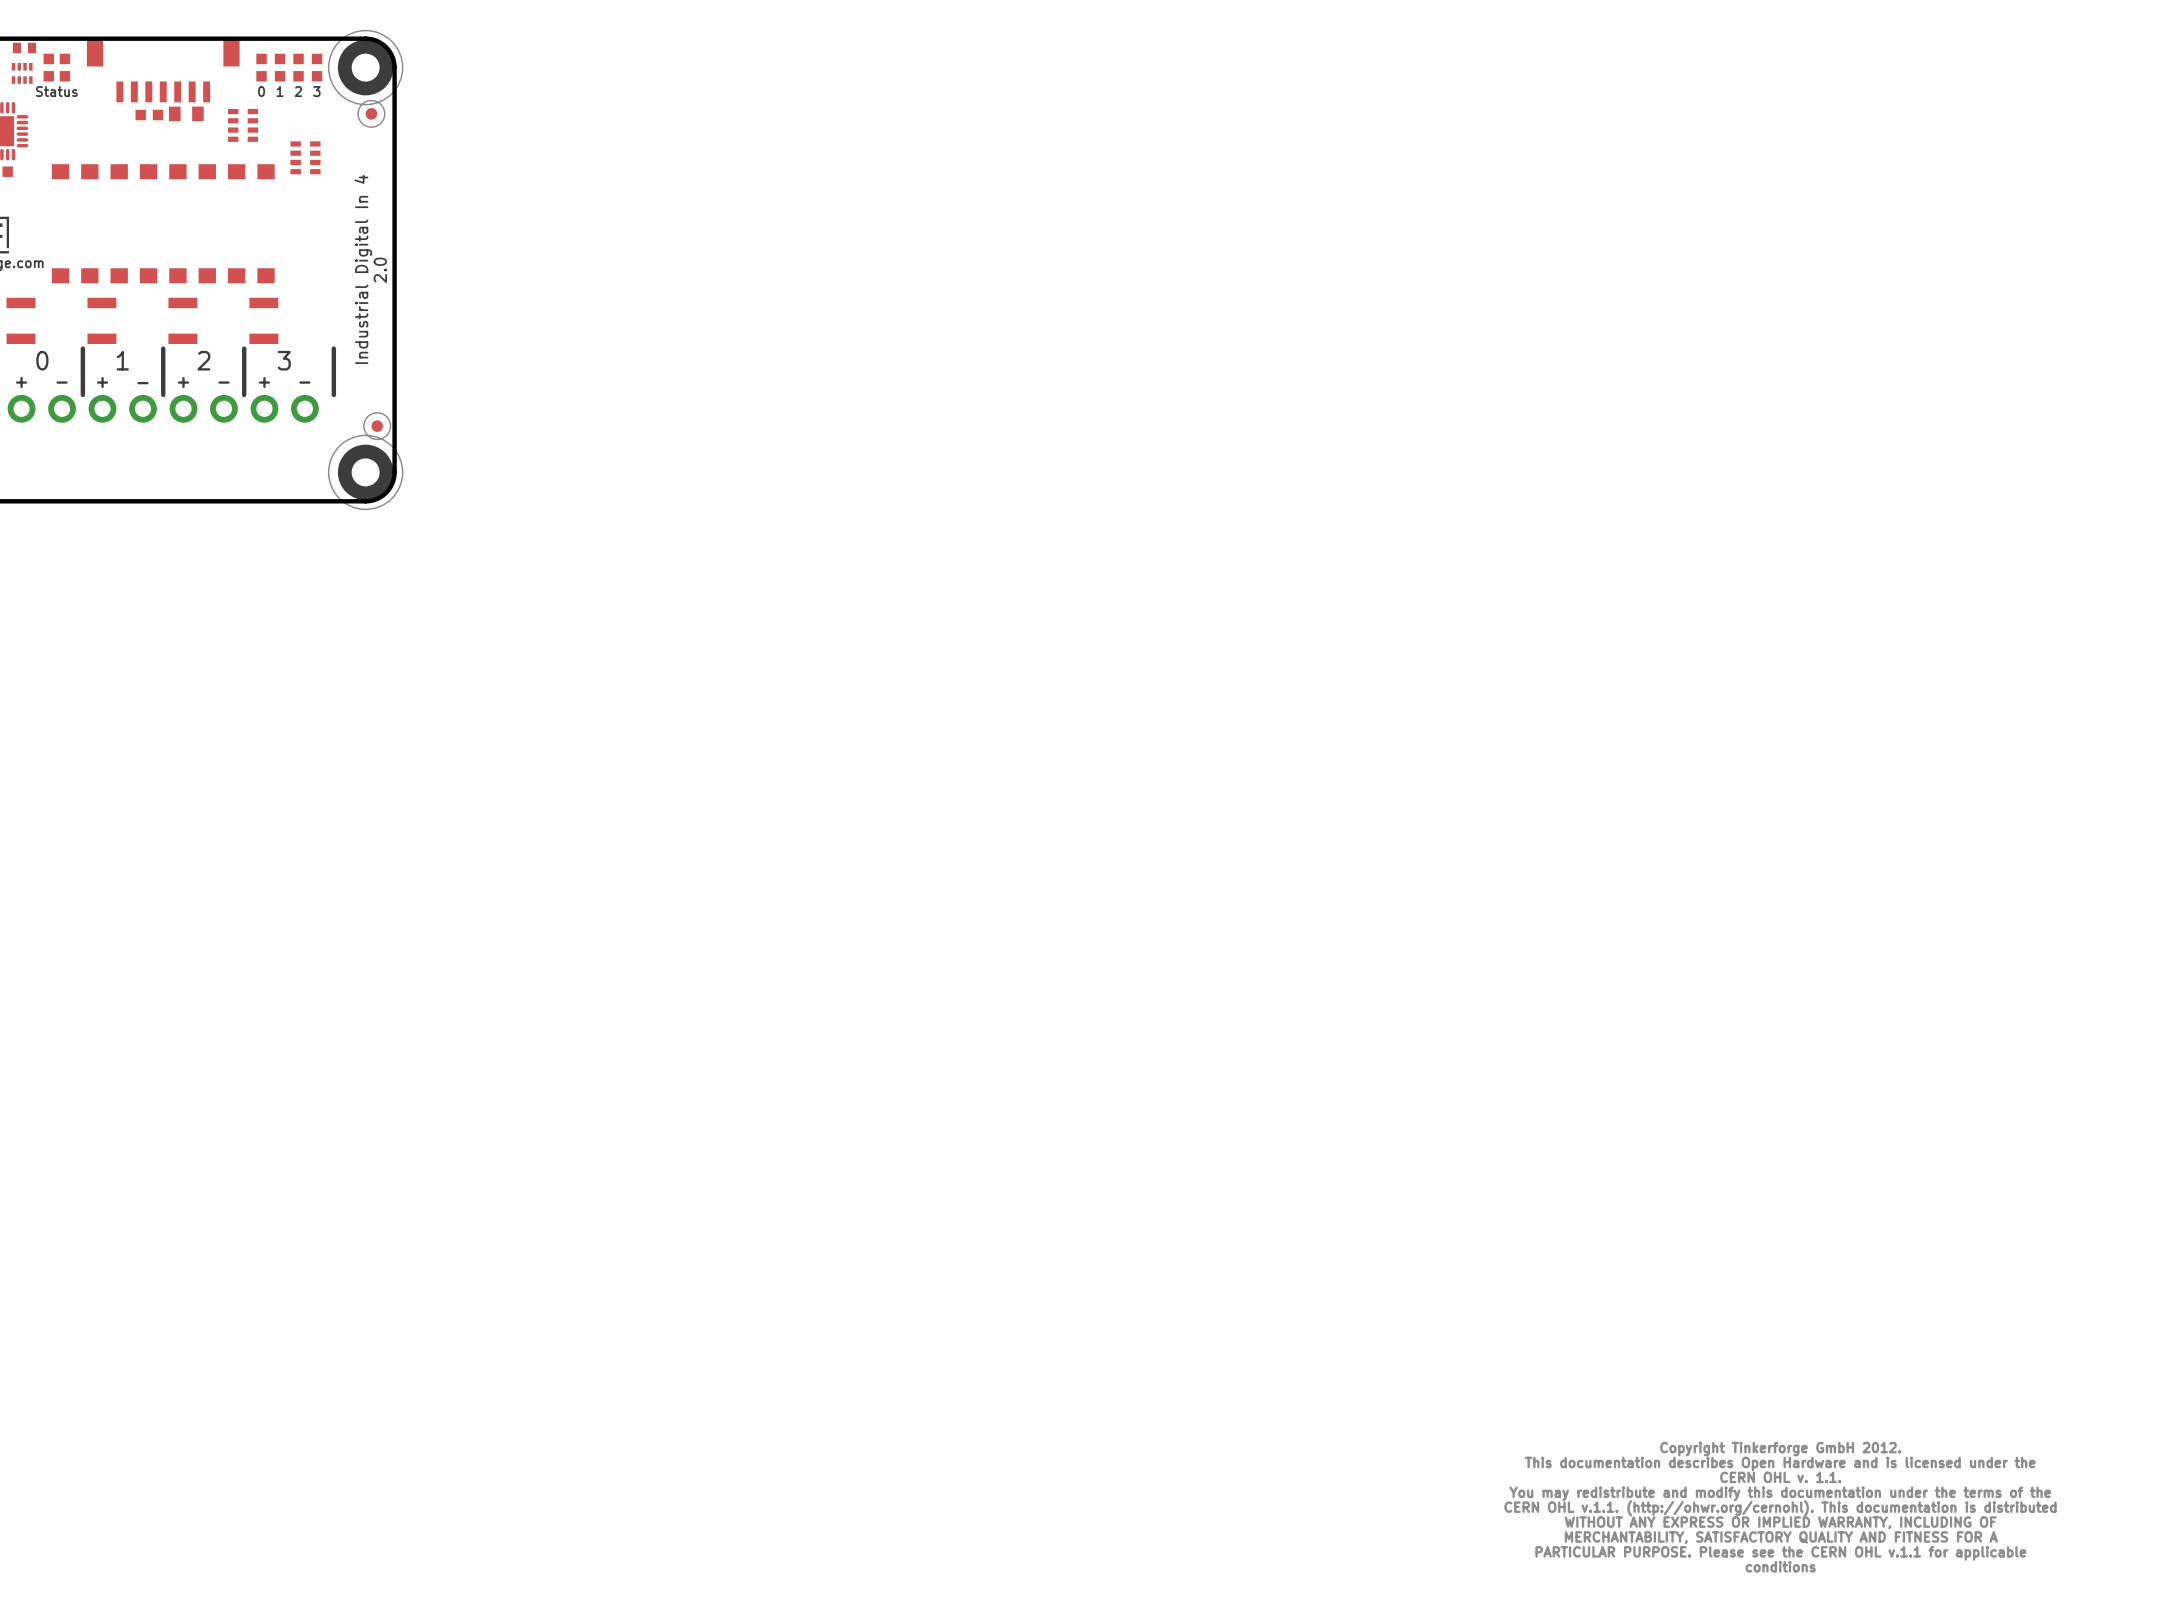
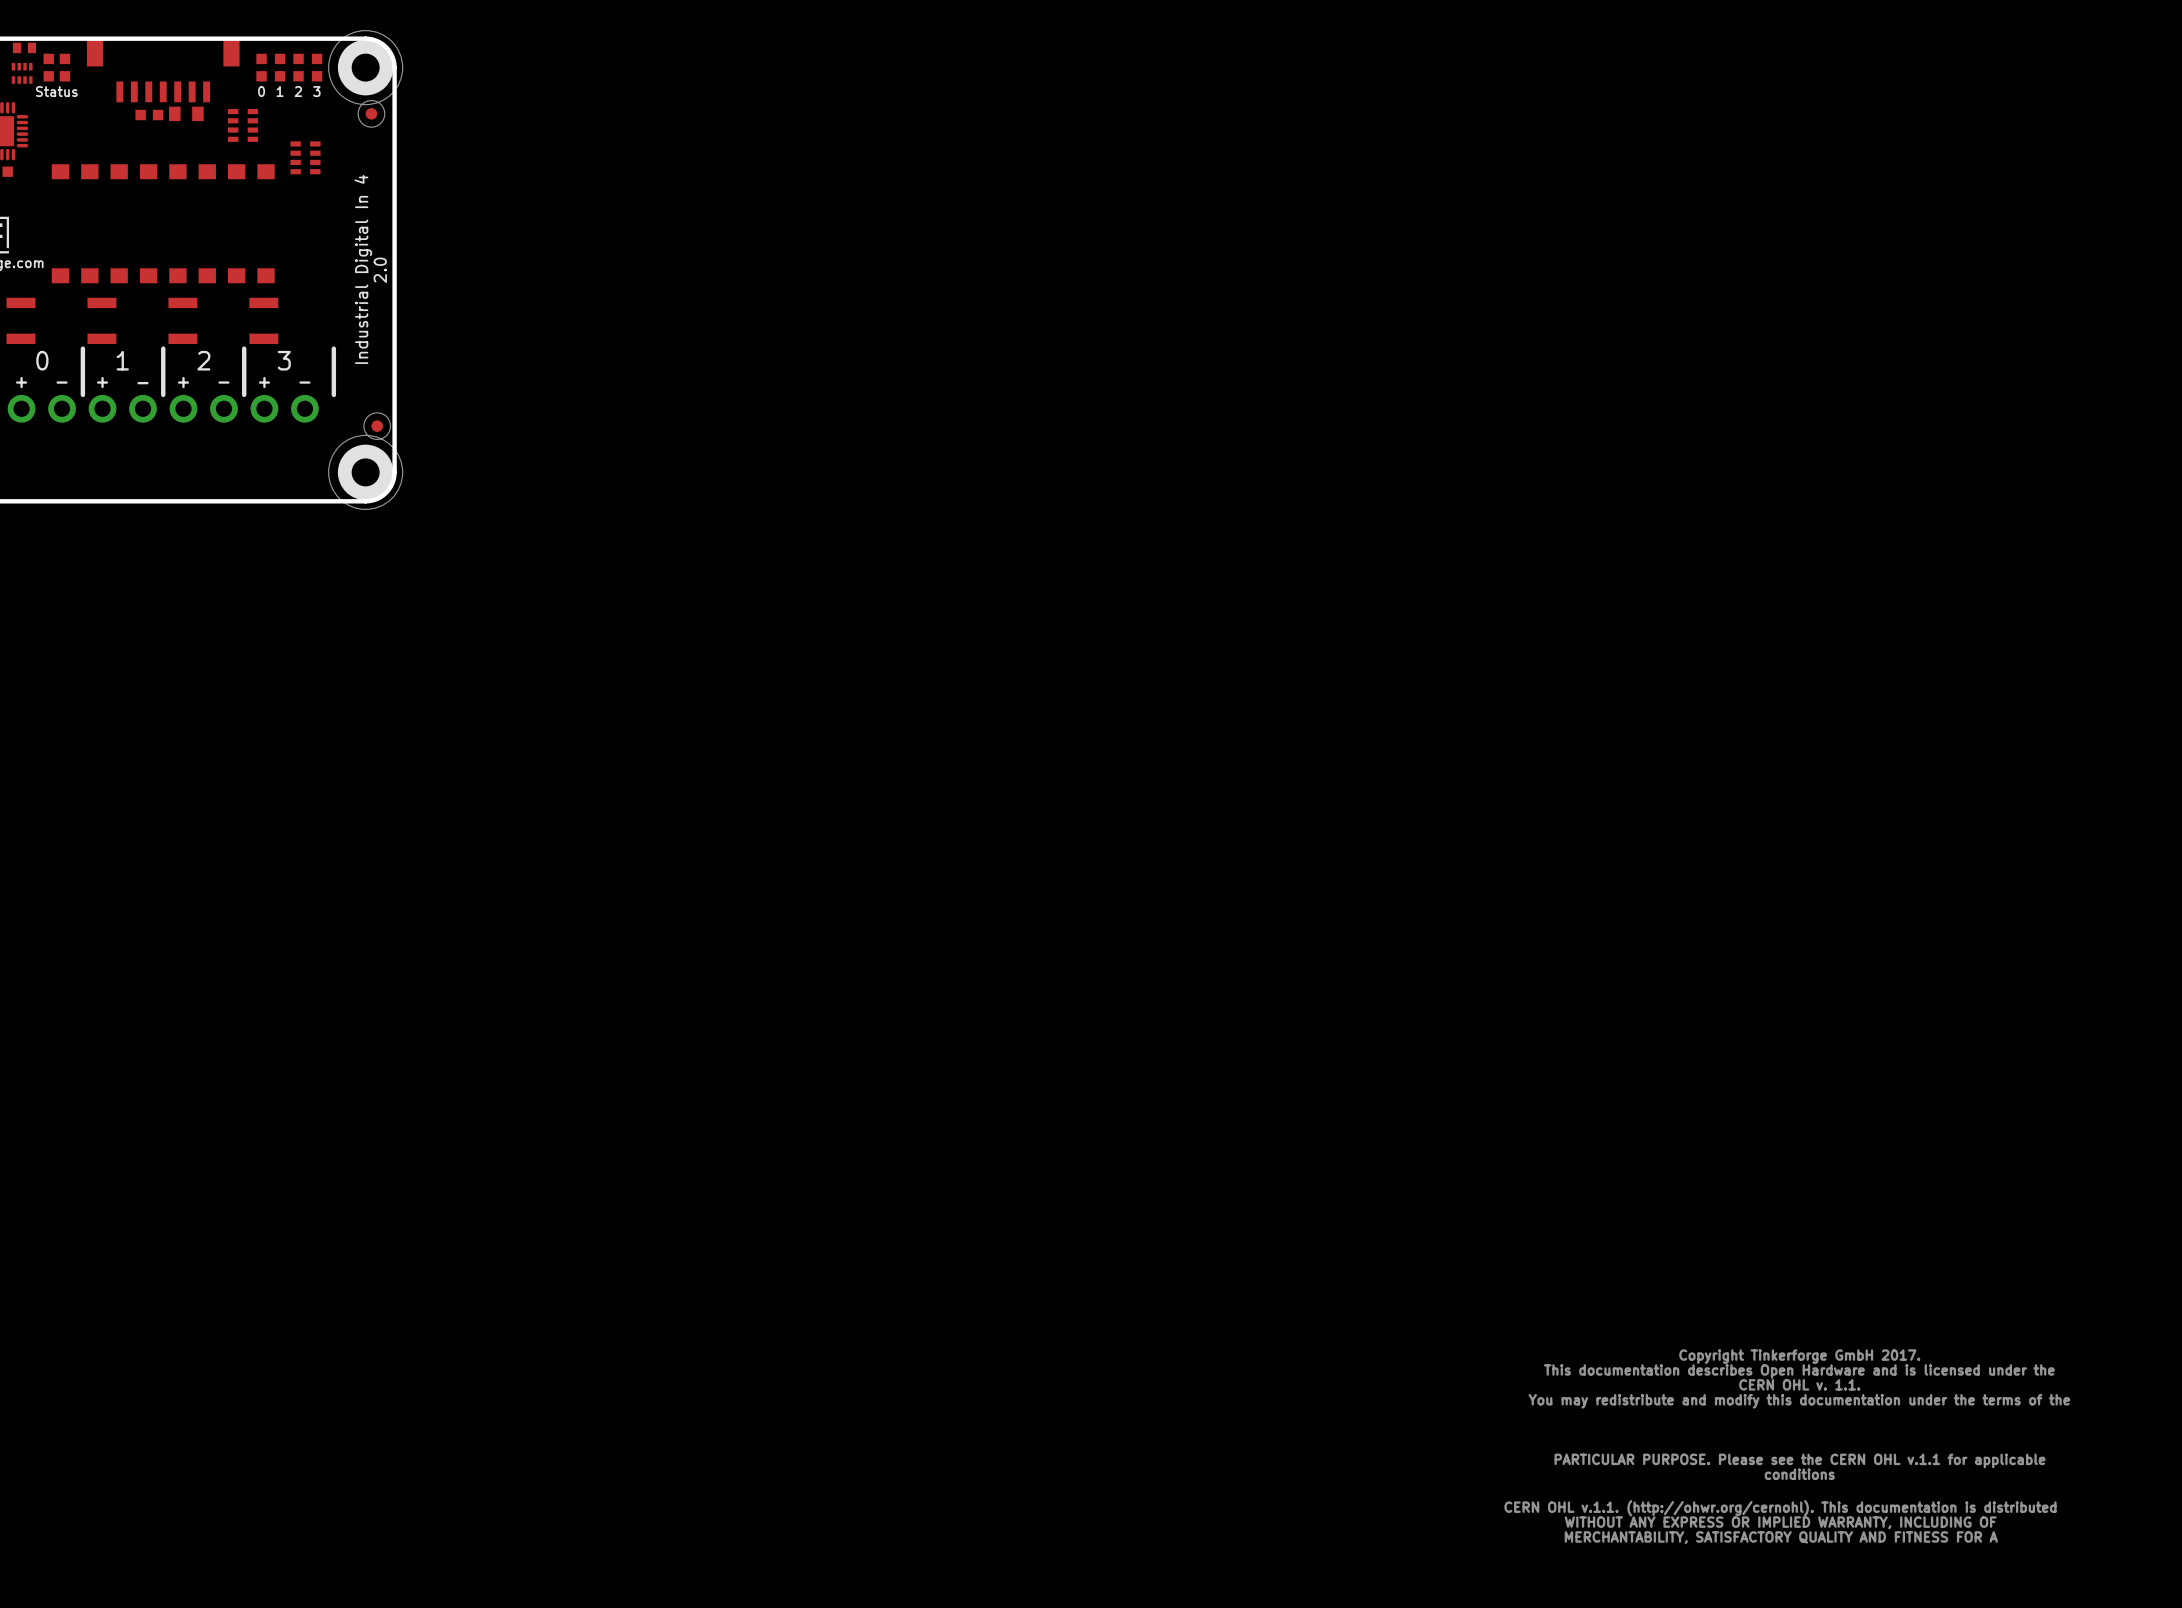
text: none -> Copyright Tinkerforge GmbH 2017. (1799, 1356)
text: Copyright Tinkerforge GmbH 2012. (1780, 1449) -> none
text position: This documentation describes Open Hardware and is licensed under the (1780, 1464) -> This documentation describes Open Hardware and is licensed under the (1799, 1371)
text position: CERN OHL v. 1.1. (1780, 1477) -> CERN OHL v. 1.1. (1799, 1384)
text position: You may redistribute and modify this documentation under the terms of the (1780, 1493) -> You may redistribute and modify this documentation under the terms of the (1799, 1401)
text position: PARTICULAR PURPOSE. Please see the CERN OHL v.1.1 for applicable (1780, 1553) -> PARTICULAR PURPOSE. Please see the CERN OHL v.1.1 for applicable (1800, 1460)
text position: conditions (1780, 1566) -> conditions (1799, 1474)

